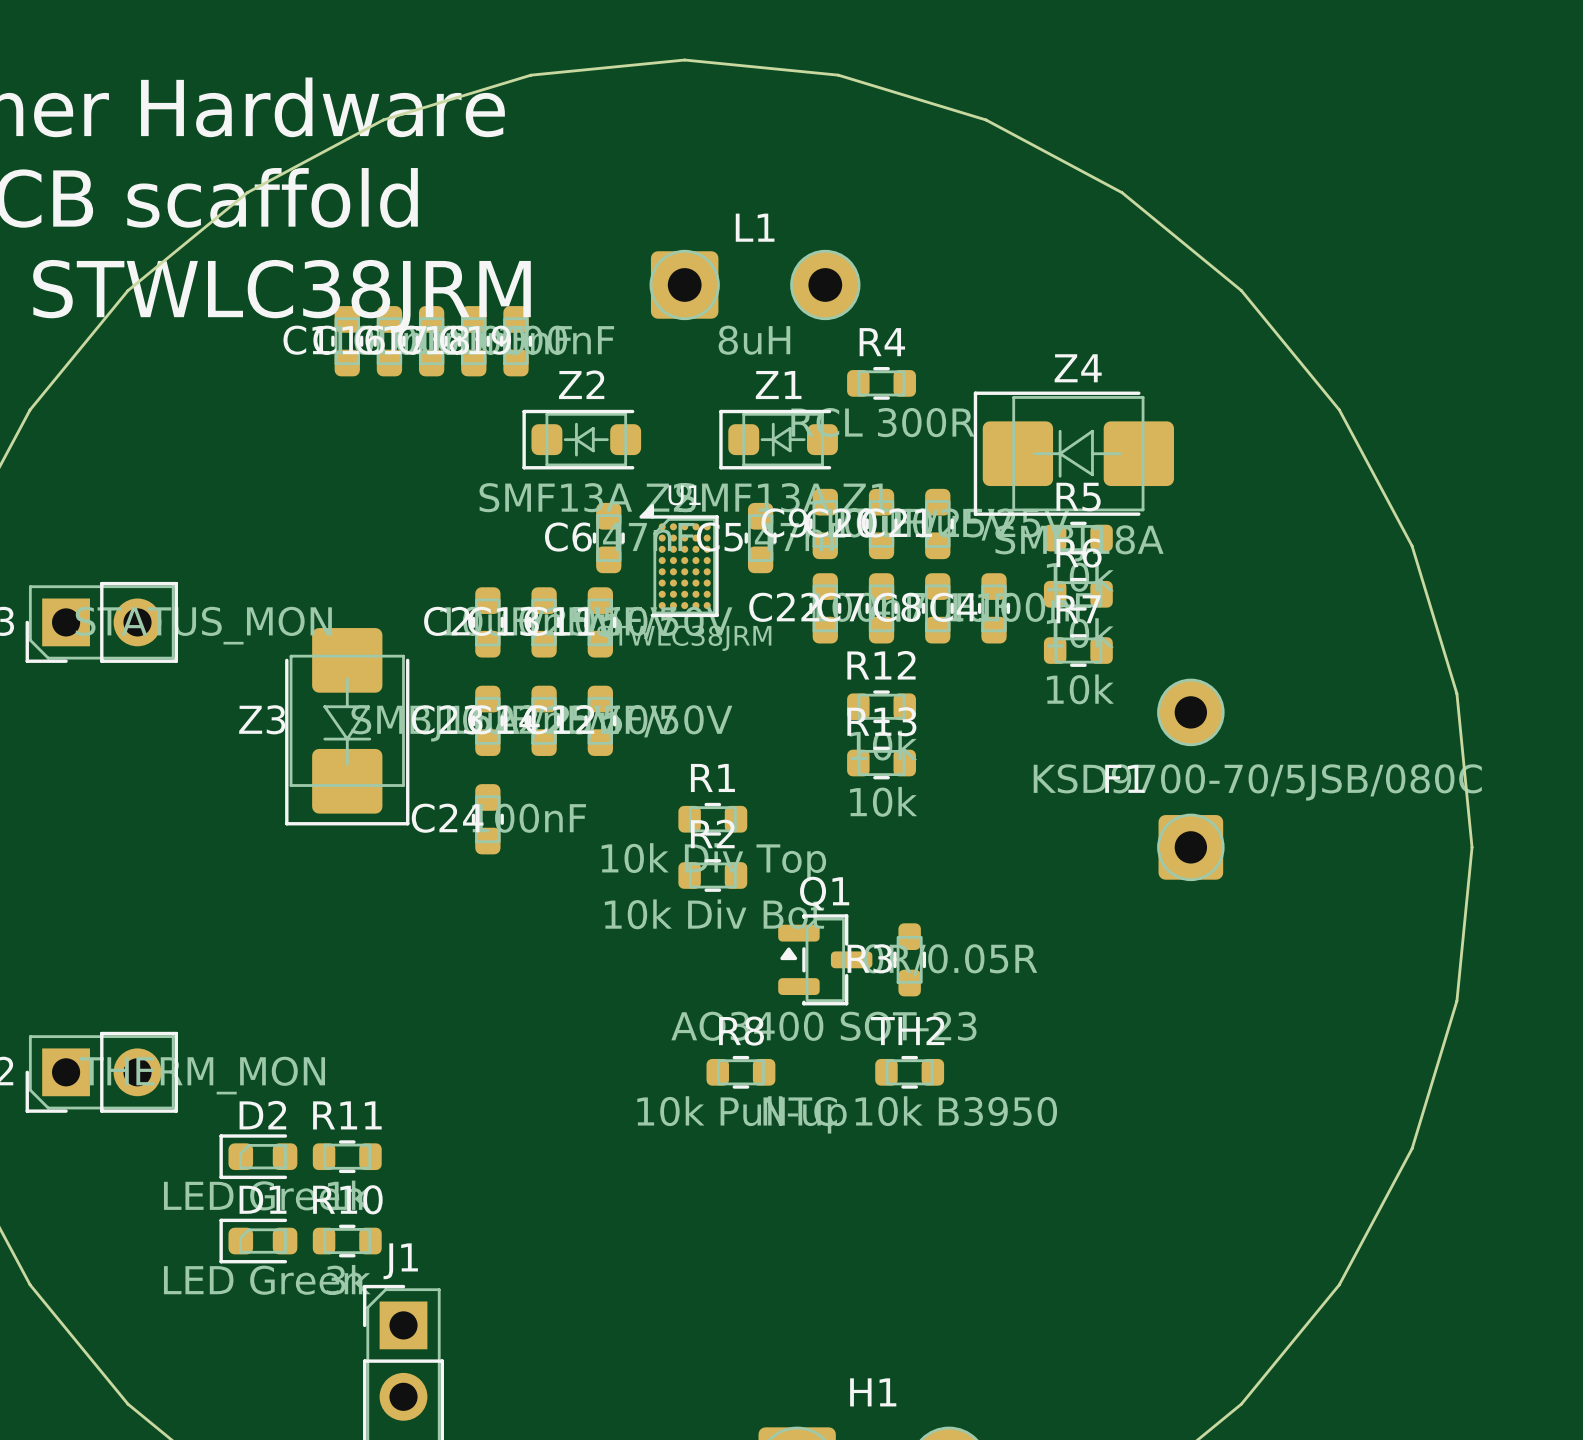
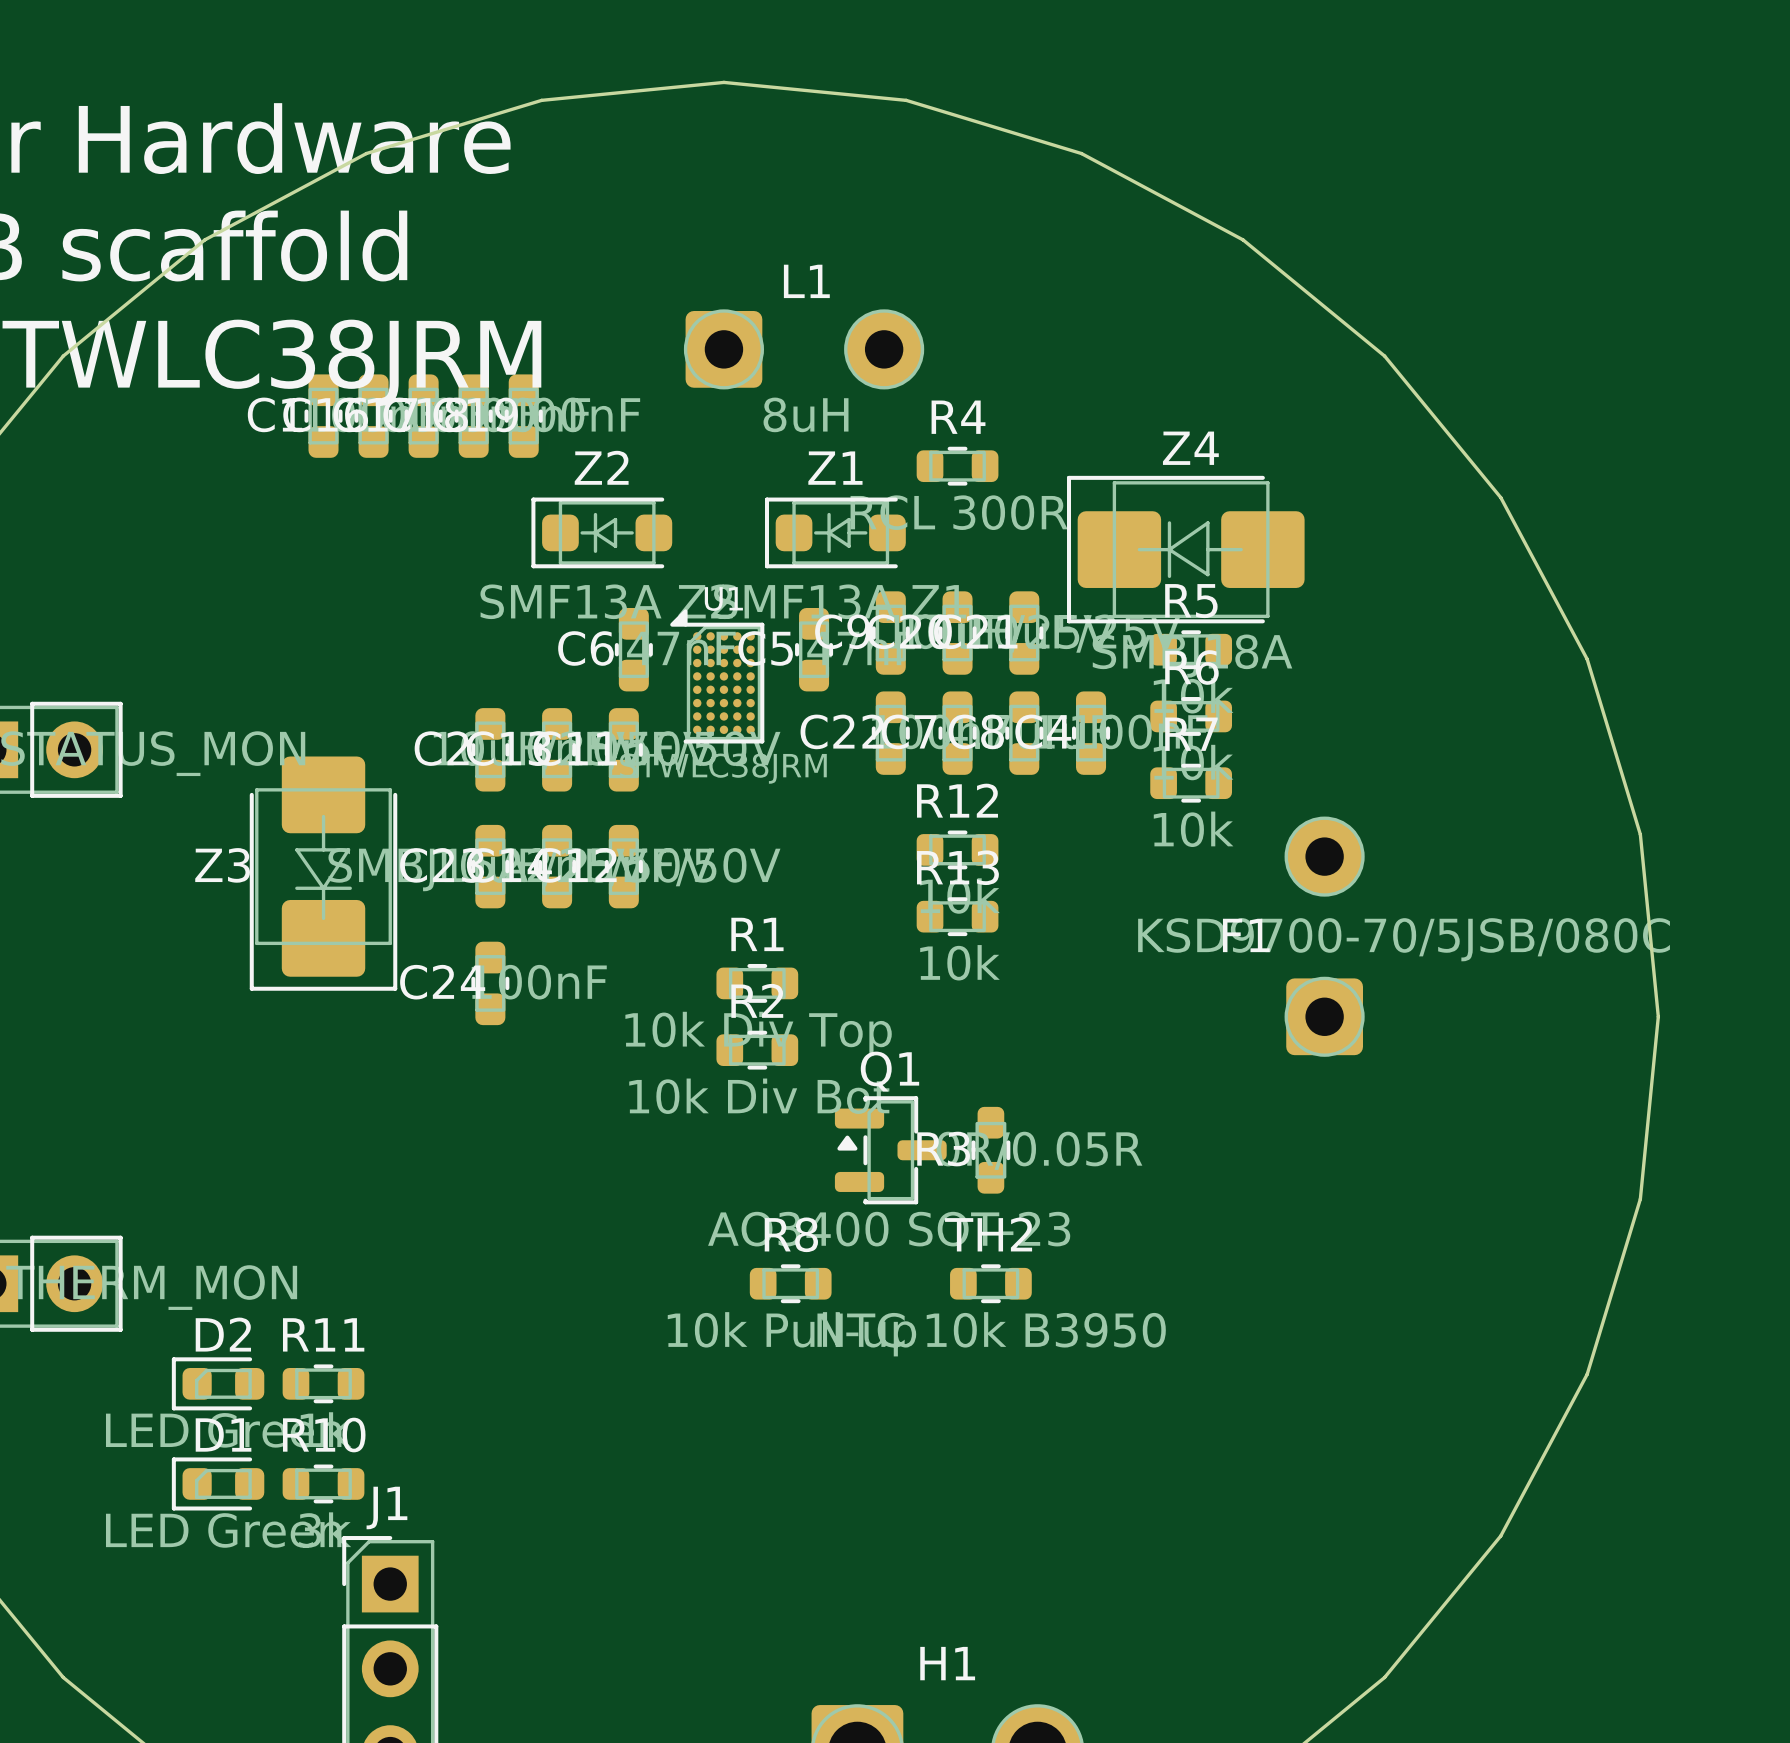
L1 footprint: [649, 249, 861, 321] -> [683, 309, 925, 390]

